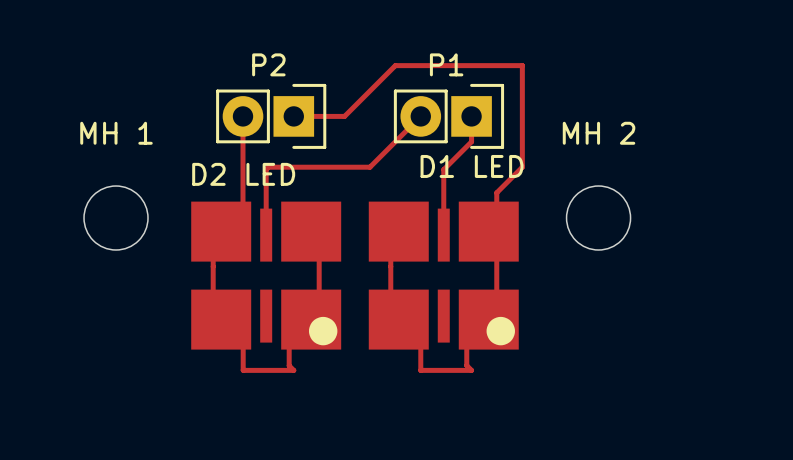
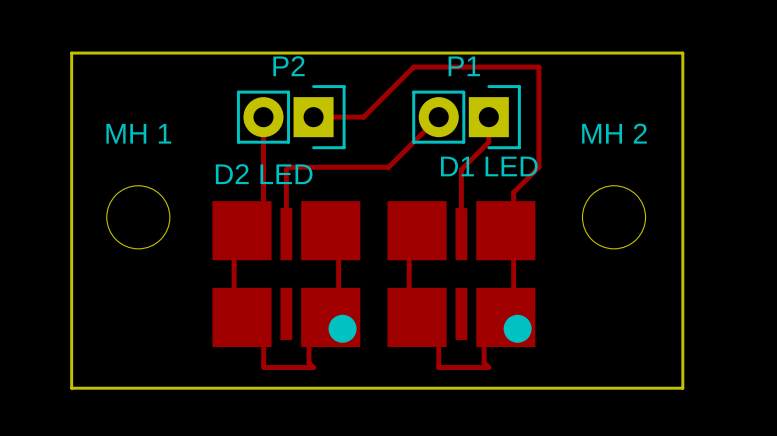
board edge: none -> (71, 53) (71, 388) (682, 388) (682, 53) (71, 53)

